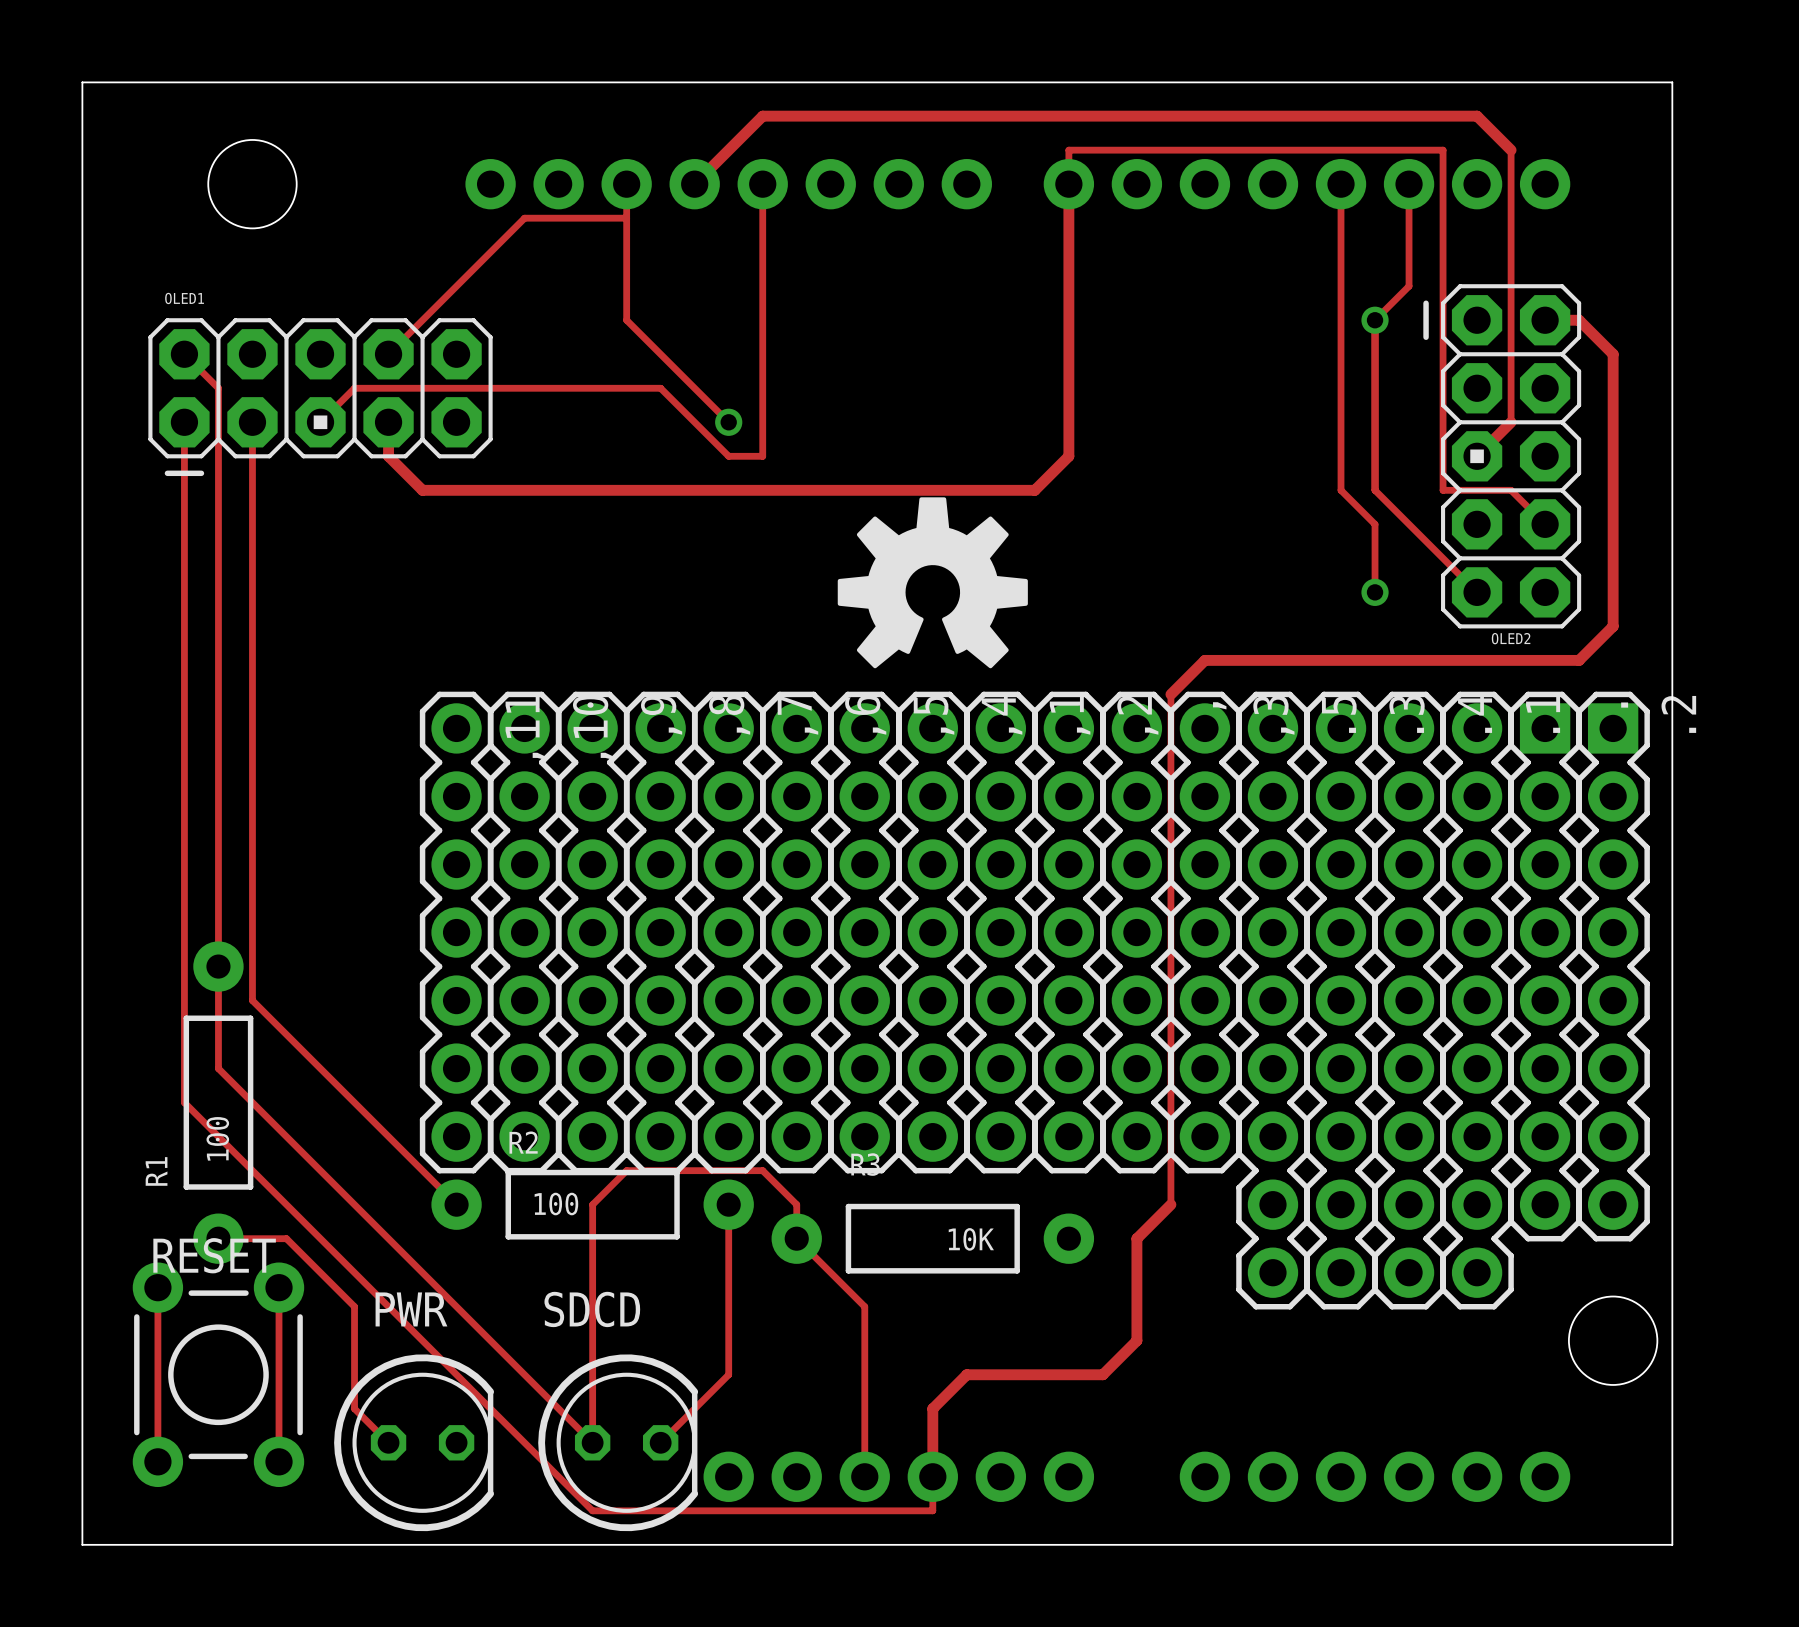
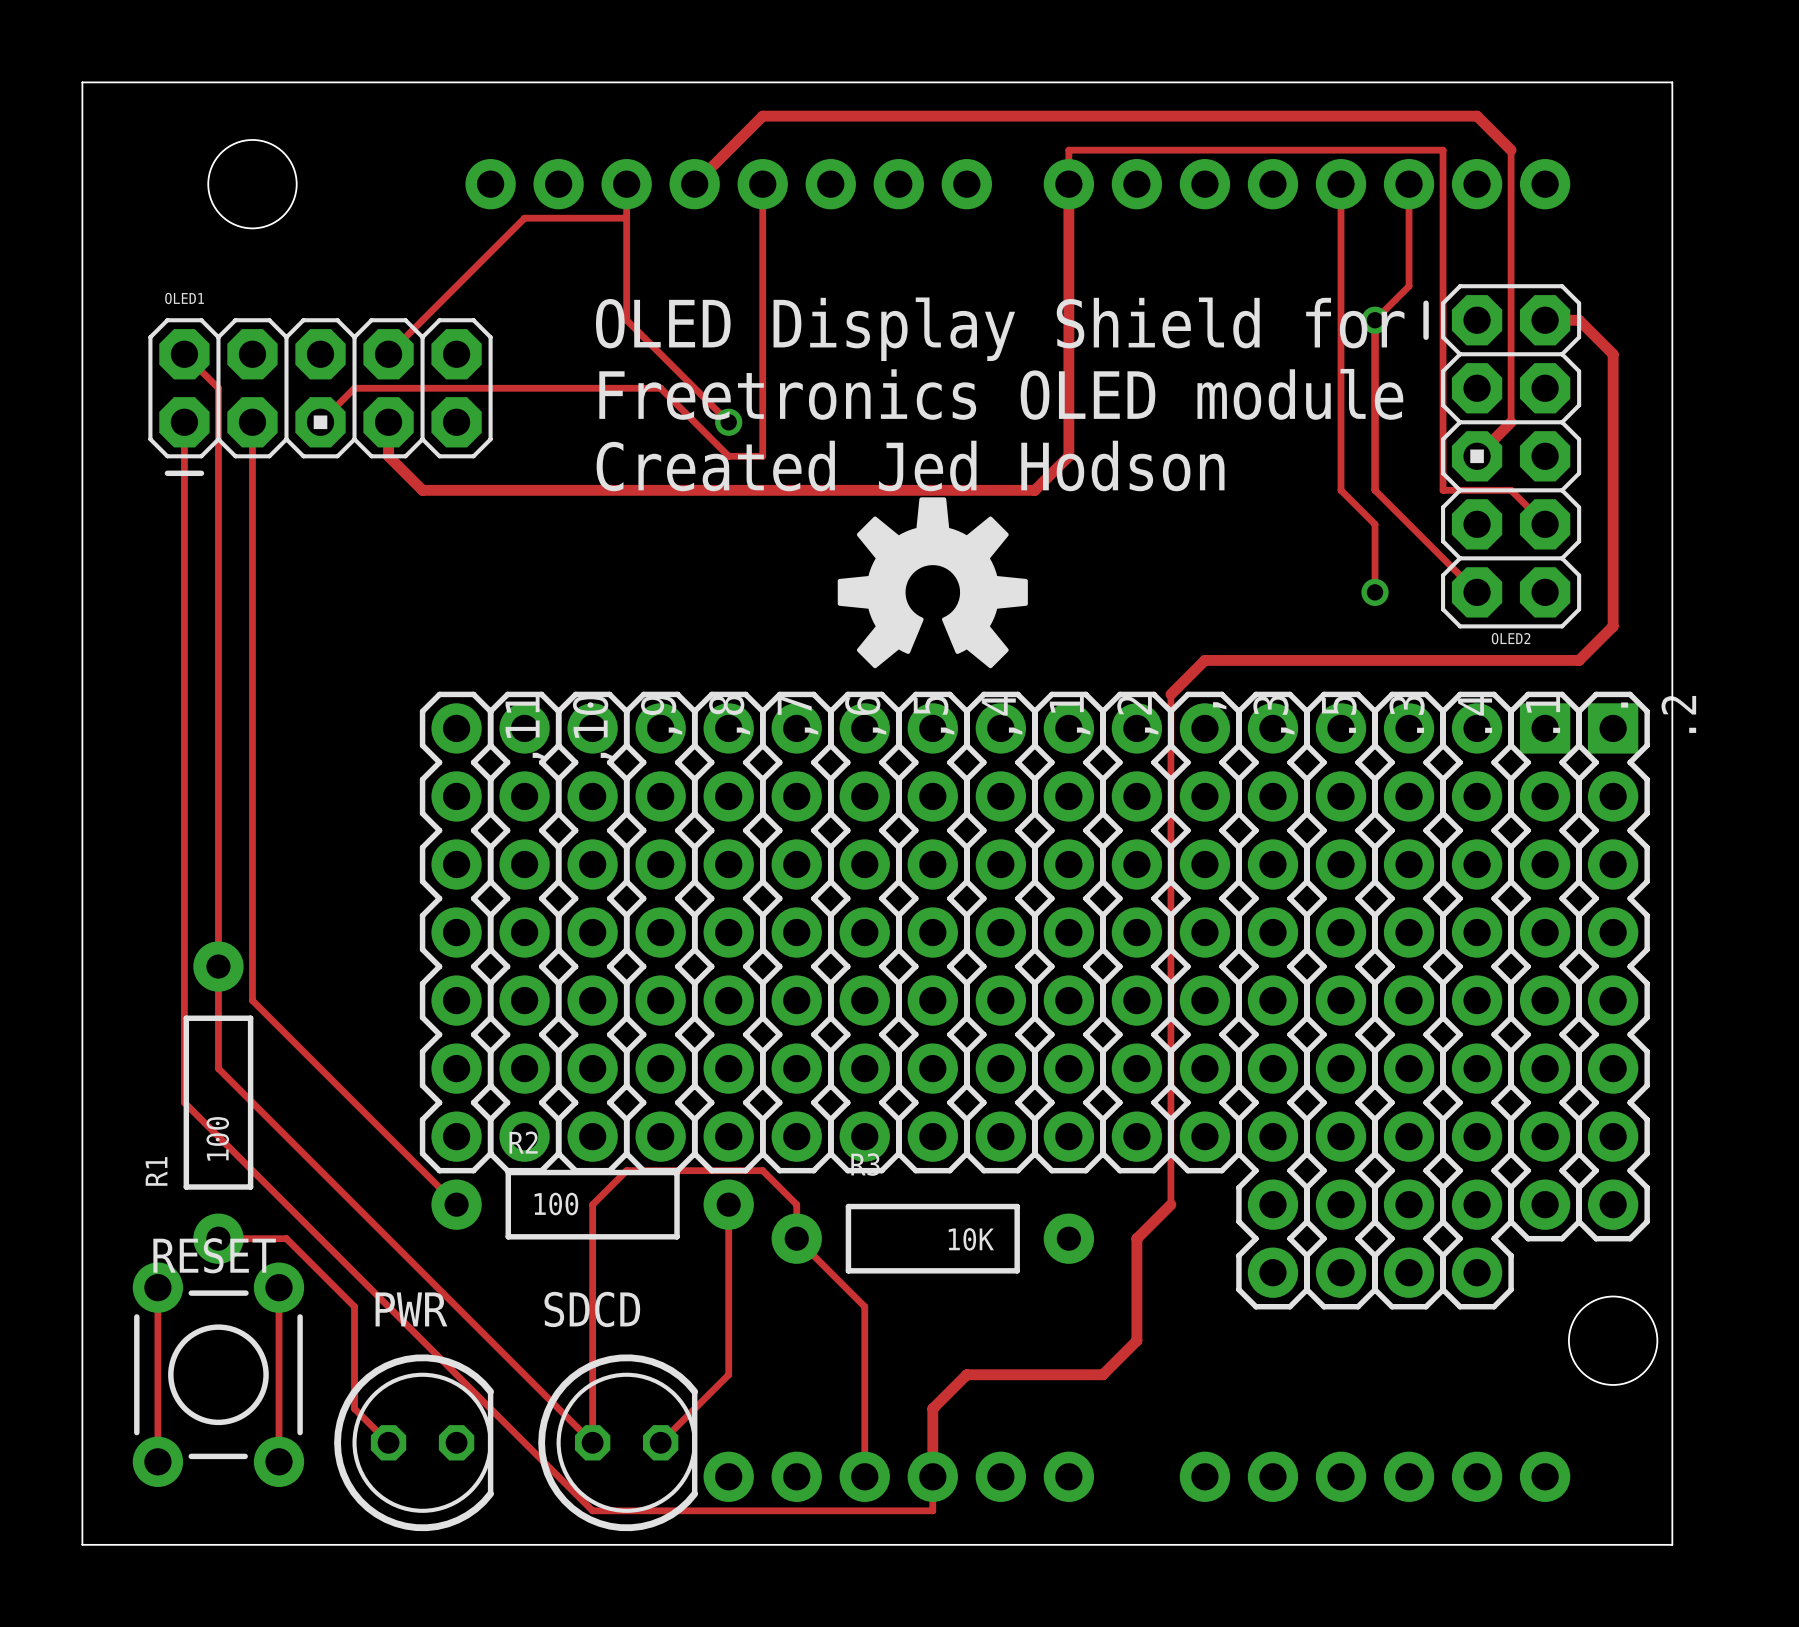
text: none -> OLED Display Shield for (1000, 329)
text: none -> Freetronics OLED module (1001, 394)
text: none -> Created Jed Hodson (910, 465)

